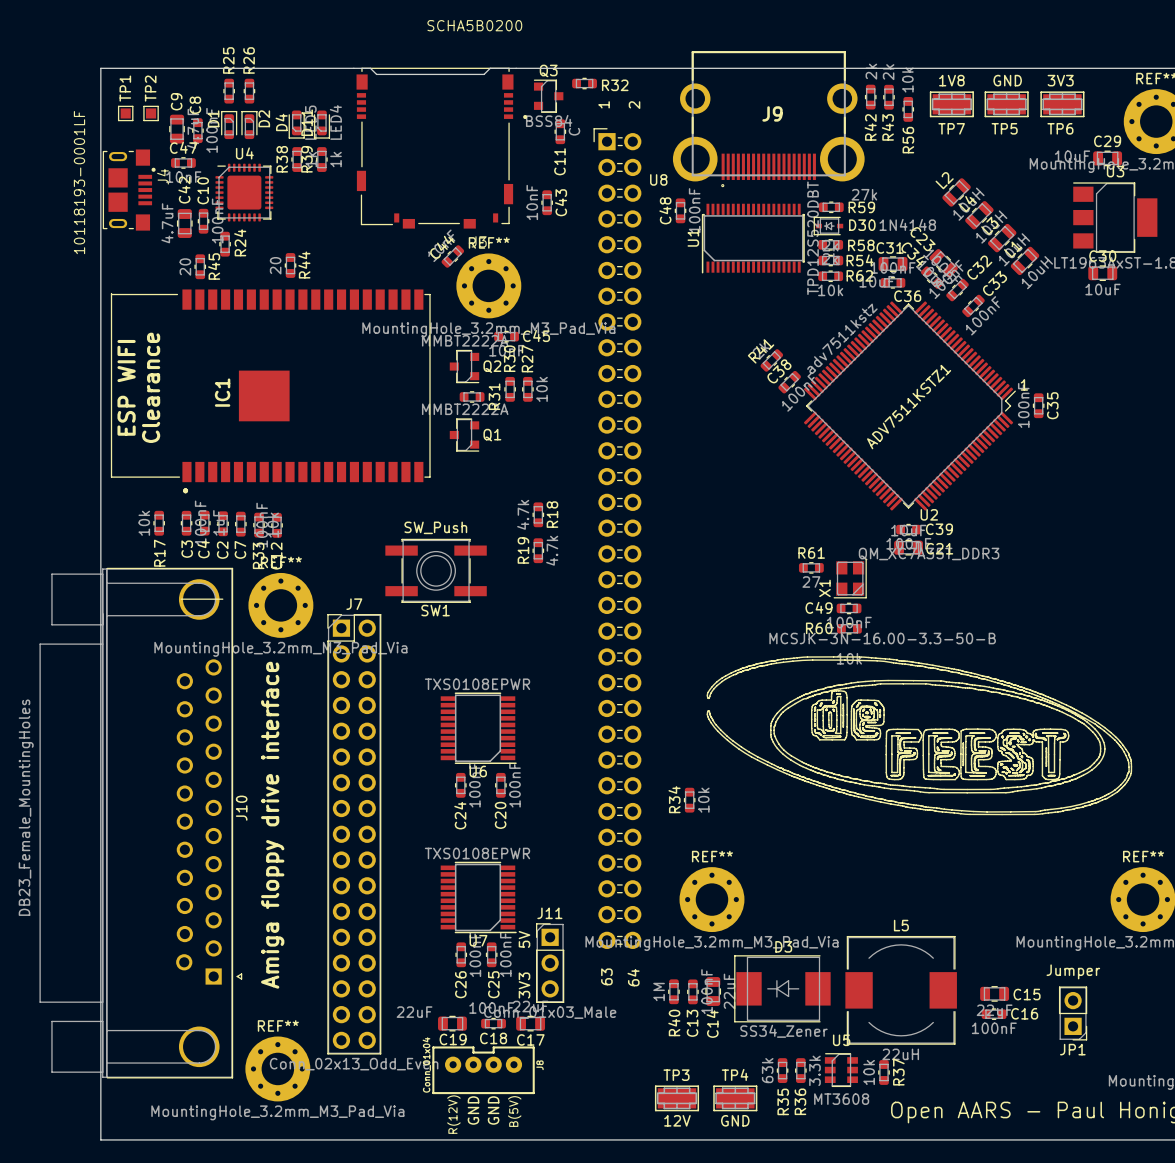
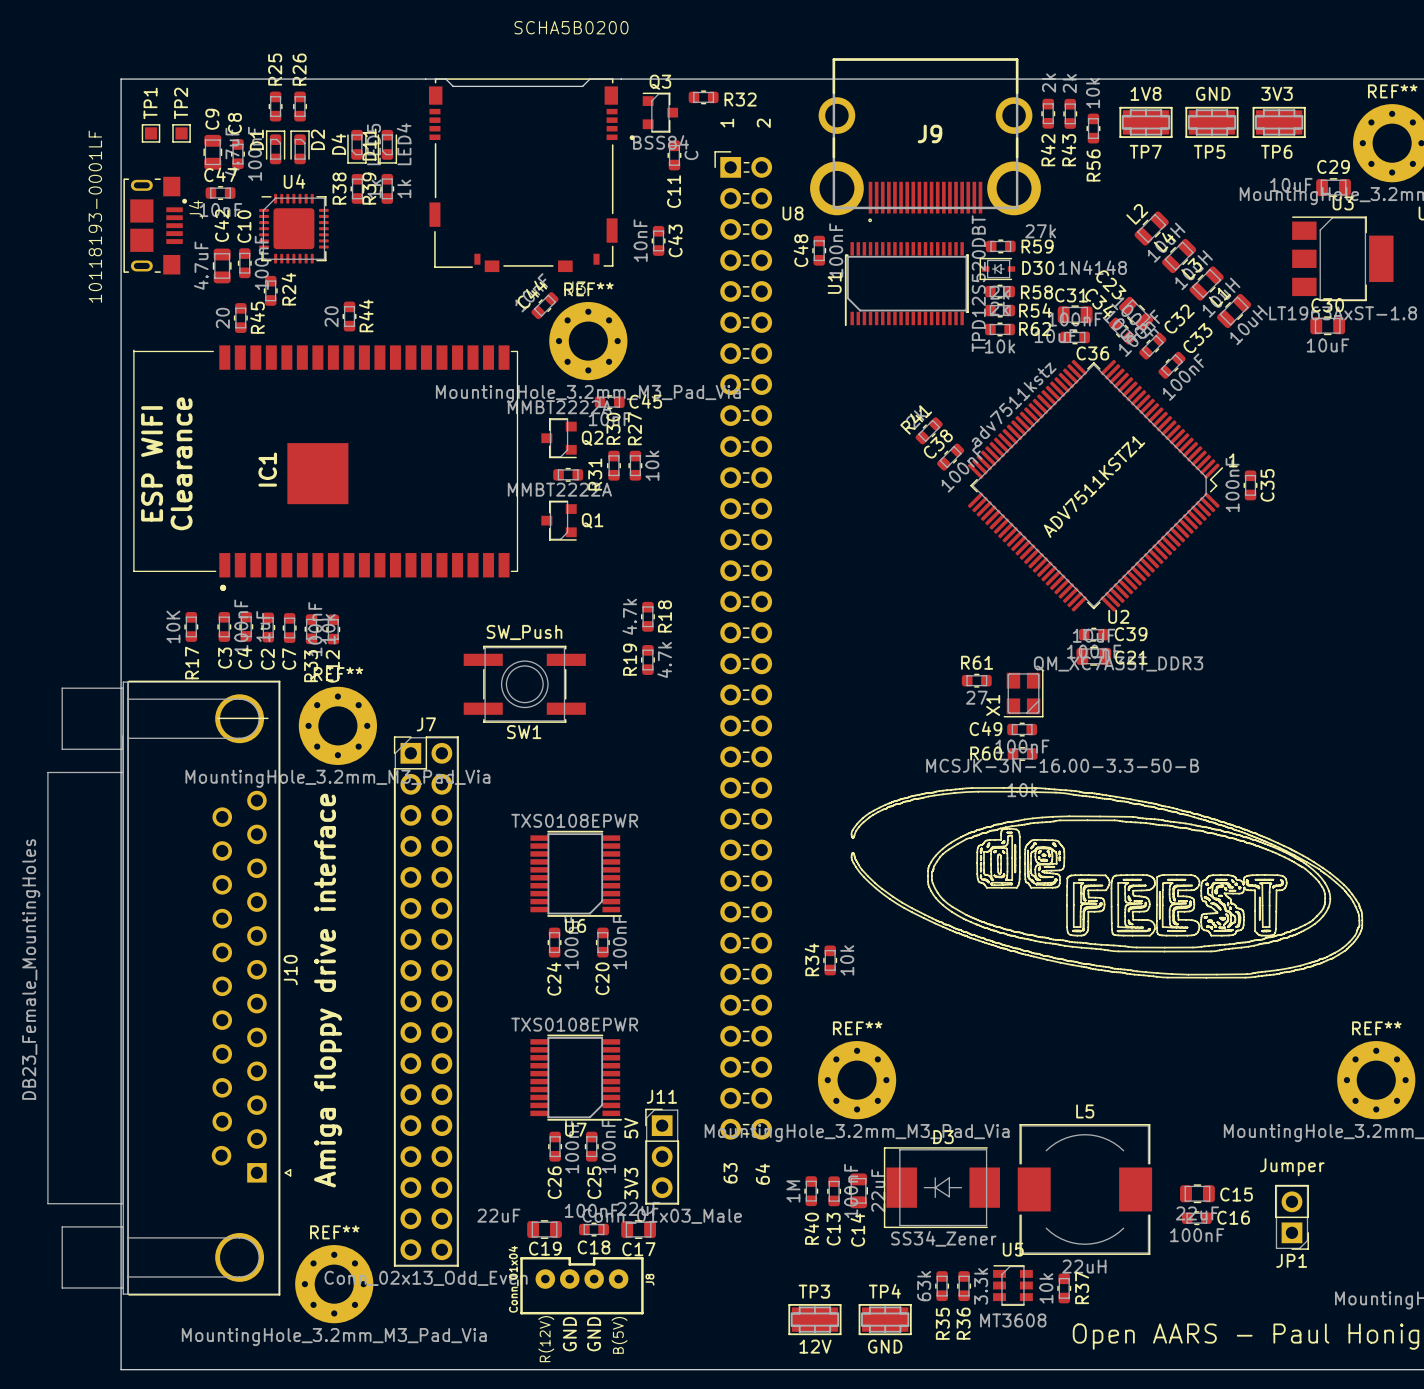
R17 value: 10k (144, 523) -> 10K (173, 626)

